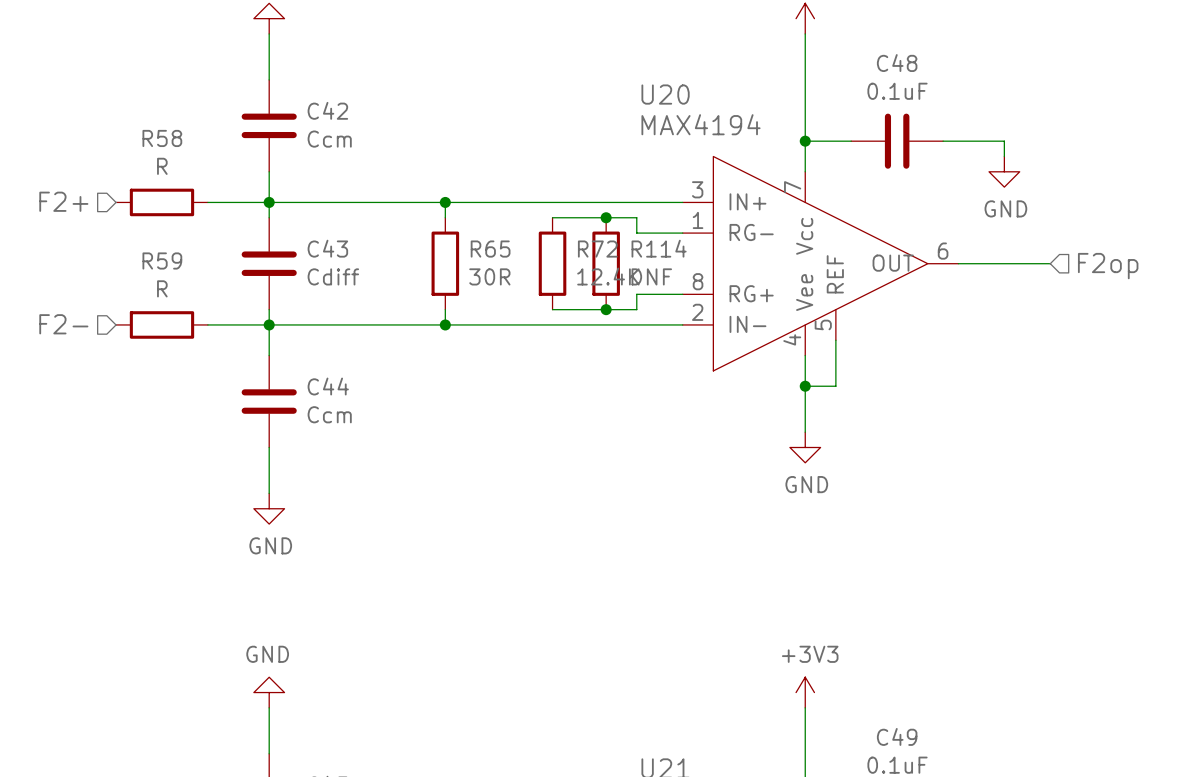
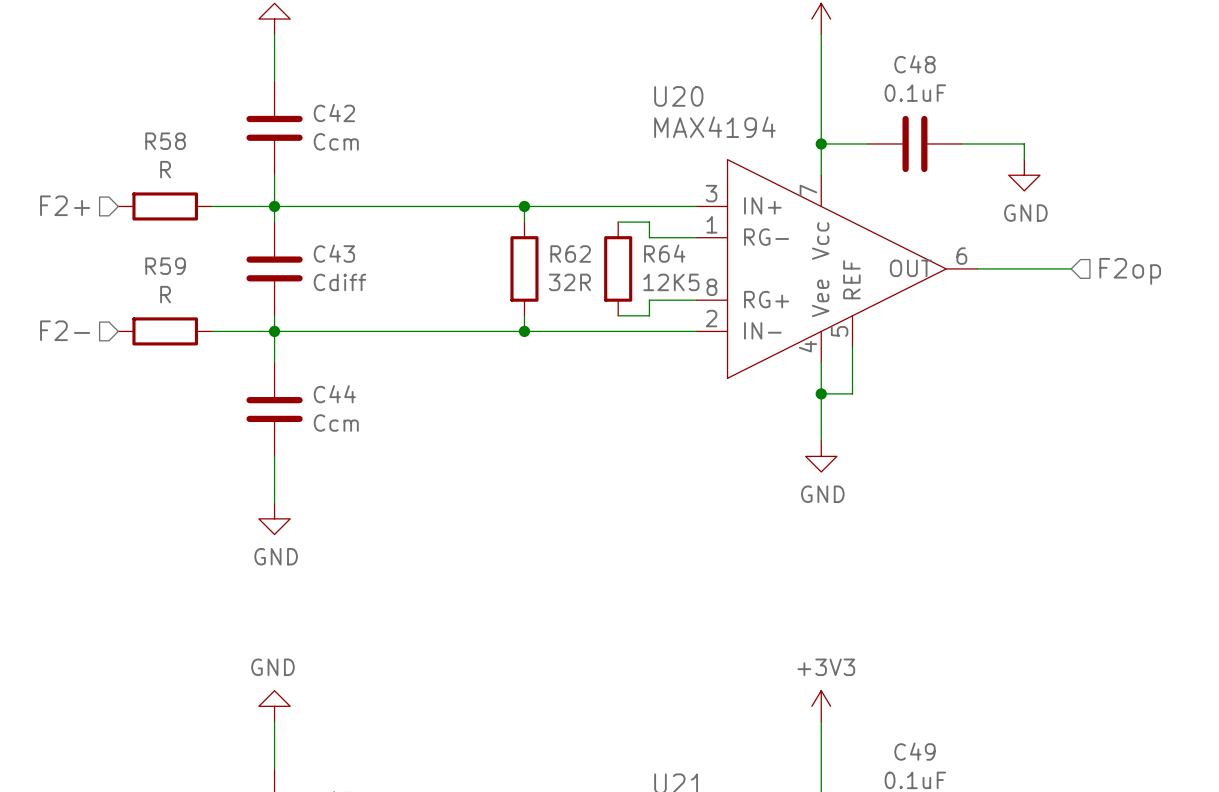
wire: (445, 202) (445, 217) -> (524, 206) (524, 222)
junction: (445, 202) -> none
junction: none -> (524, 206)
wire: (552, 217) (606, 217) -> none
junction: (606, 217) -> none
R114 name: R114 (659, 248) -> R64 (664, 253)
R65: 30R (445, 263) -> none
R62: none -> 32R (524, 268)
R72: 12.4K (552, 263) -> none
R114 value: DNF (651, 276) -> 12K5 (671, 282)
wire: (445, 309) (445, 324) -> (524, 315) (524, 331)
wire: (552, 309) (606, 309) -> none
junction: (606, 309) -> none
junction: (445, 324) -> none
junction: none -> (524, 331)

